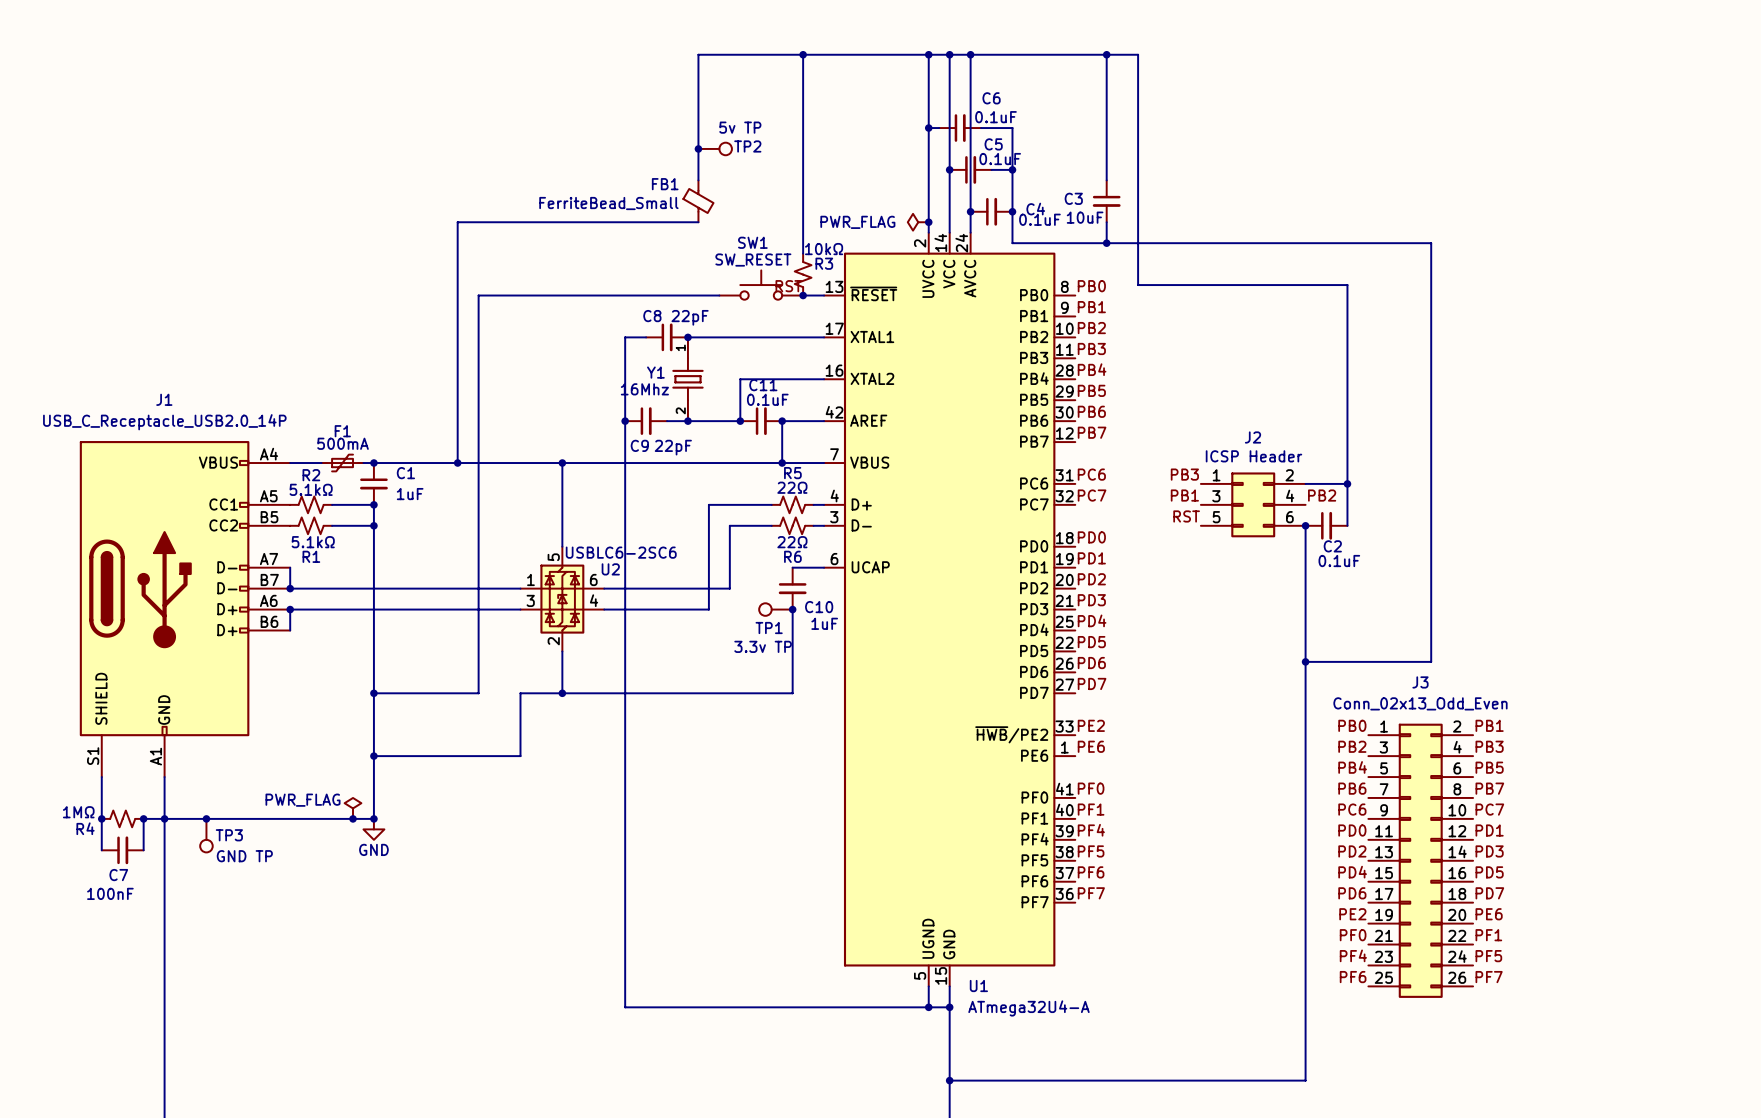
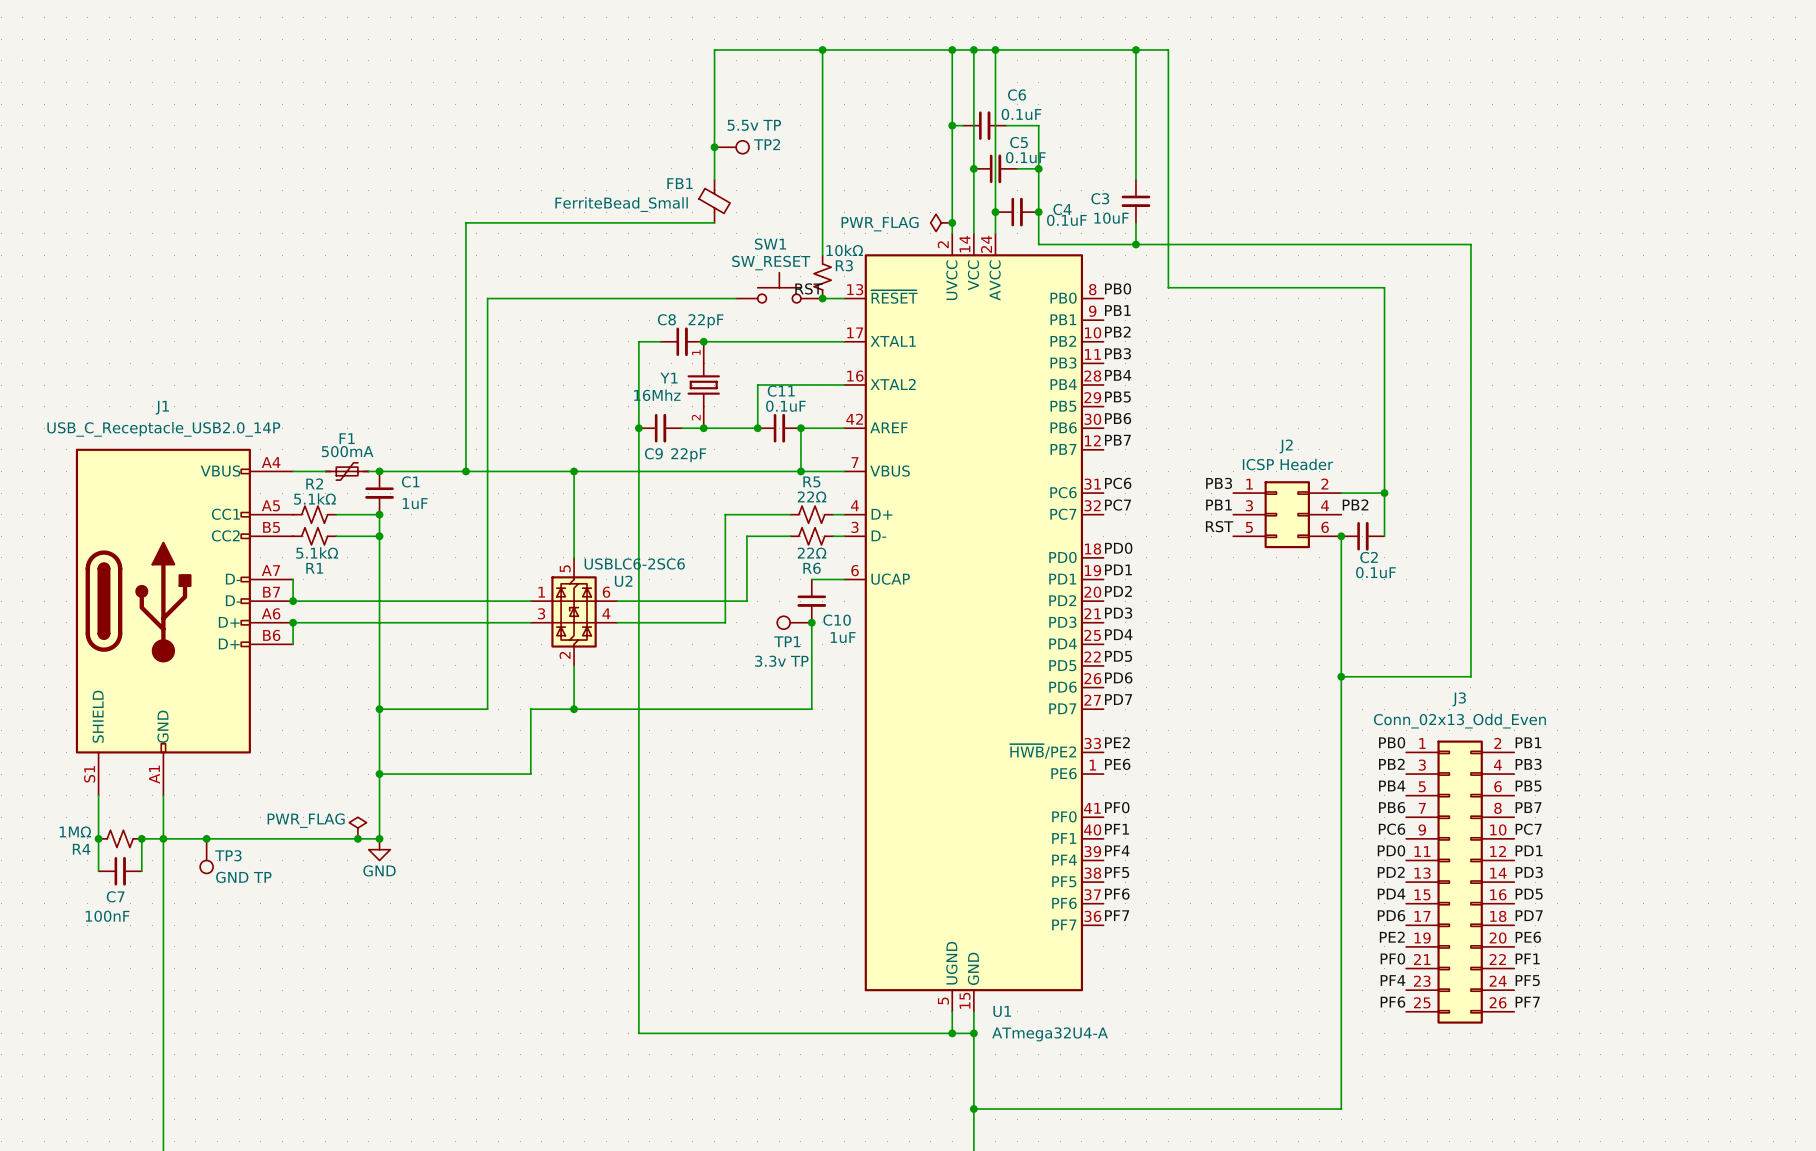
TP2 value: 5v TP (740, 127) -> 5.5v TP (754, 125)

